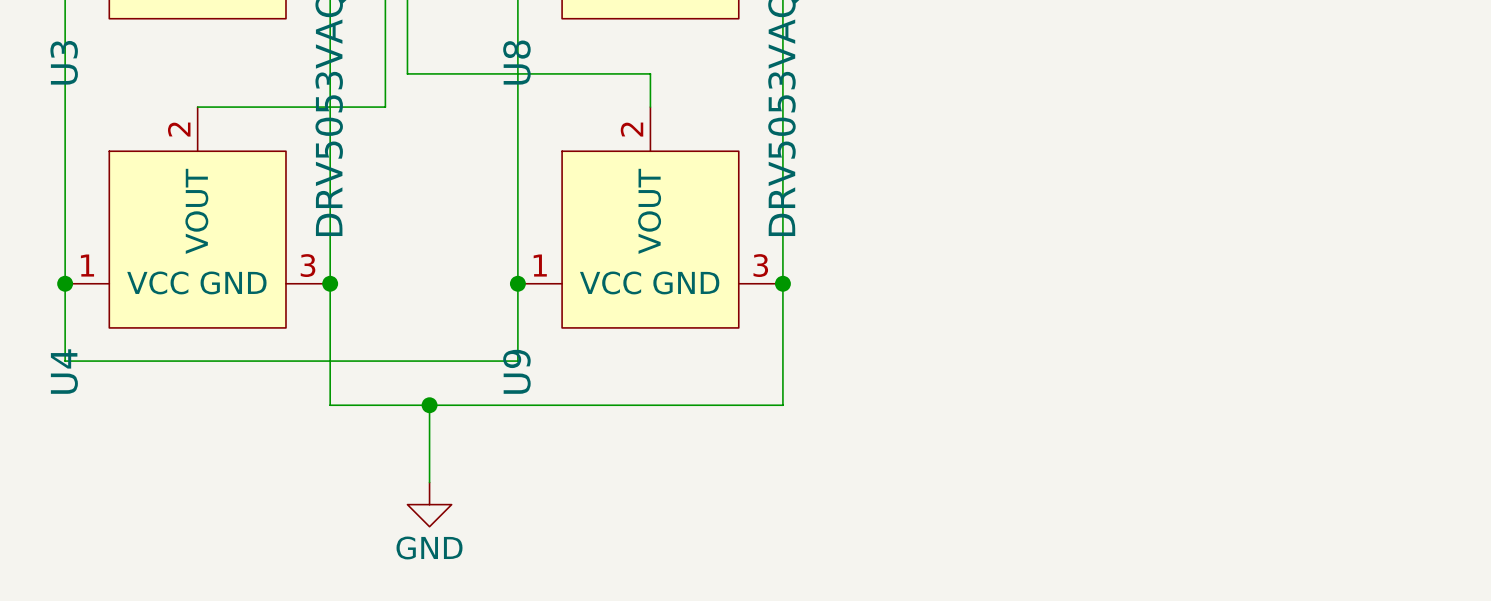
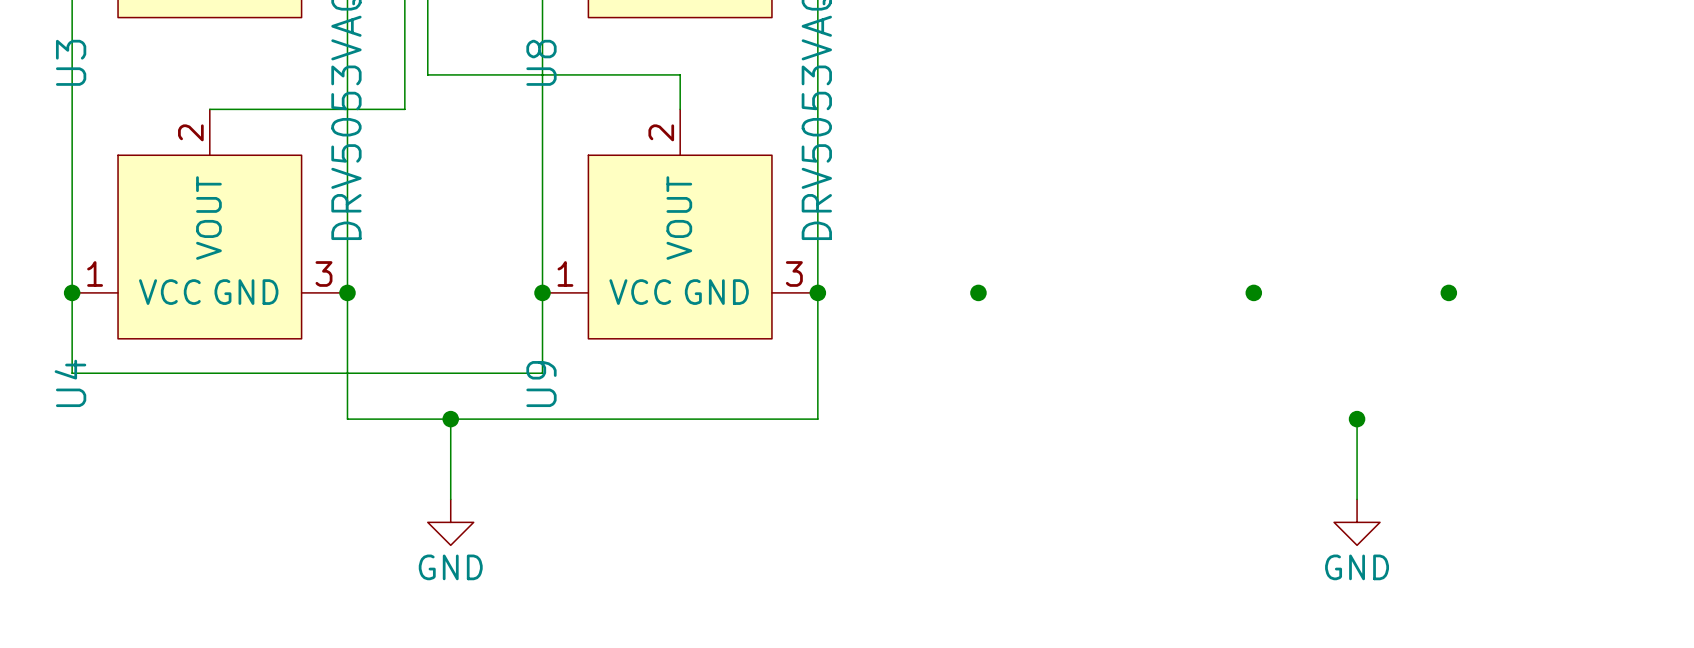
junction: none -> (978, 292)
junction: none -> (1253, 292)
junction: none -> (1448, 292)
wire: none -> (1357, 419) (1357, 499)
junction: none -> (1357, 419)
power symbol: none -> GND (1357, 522)

